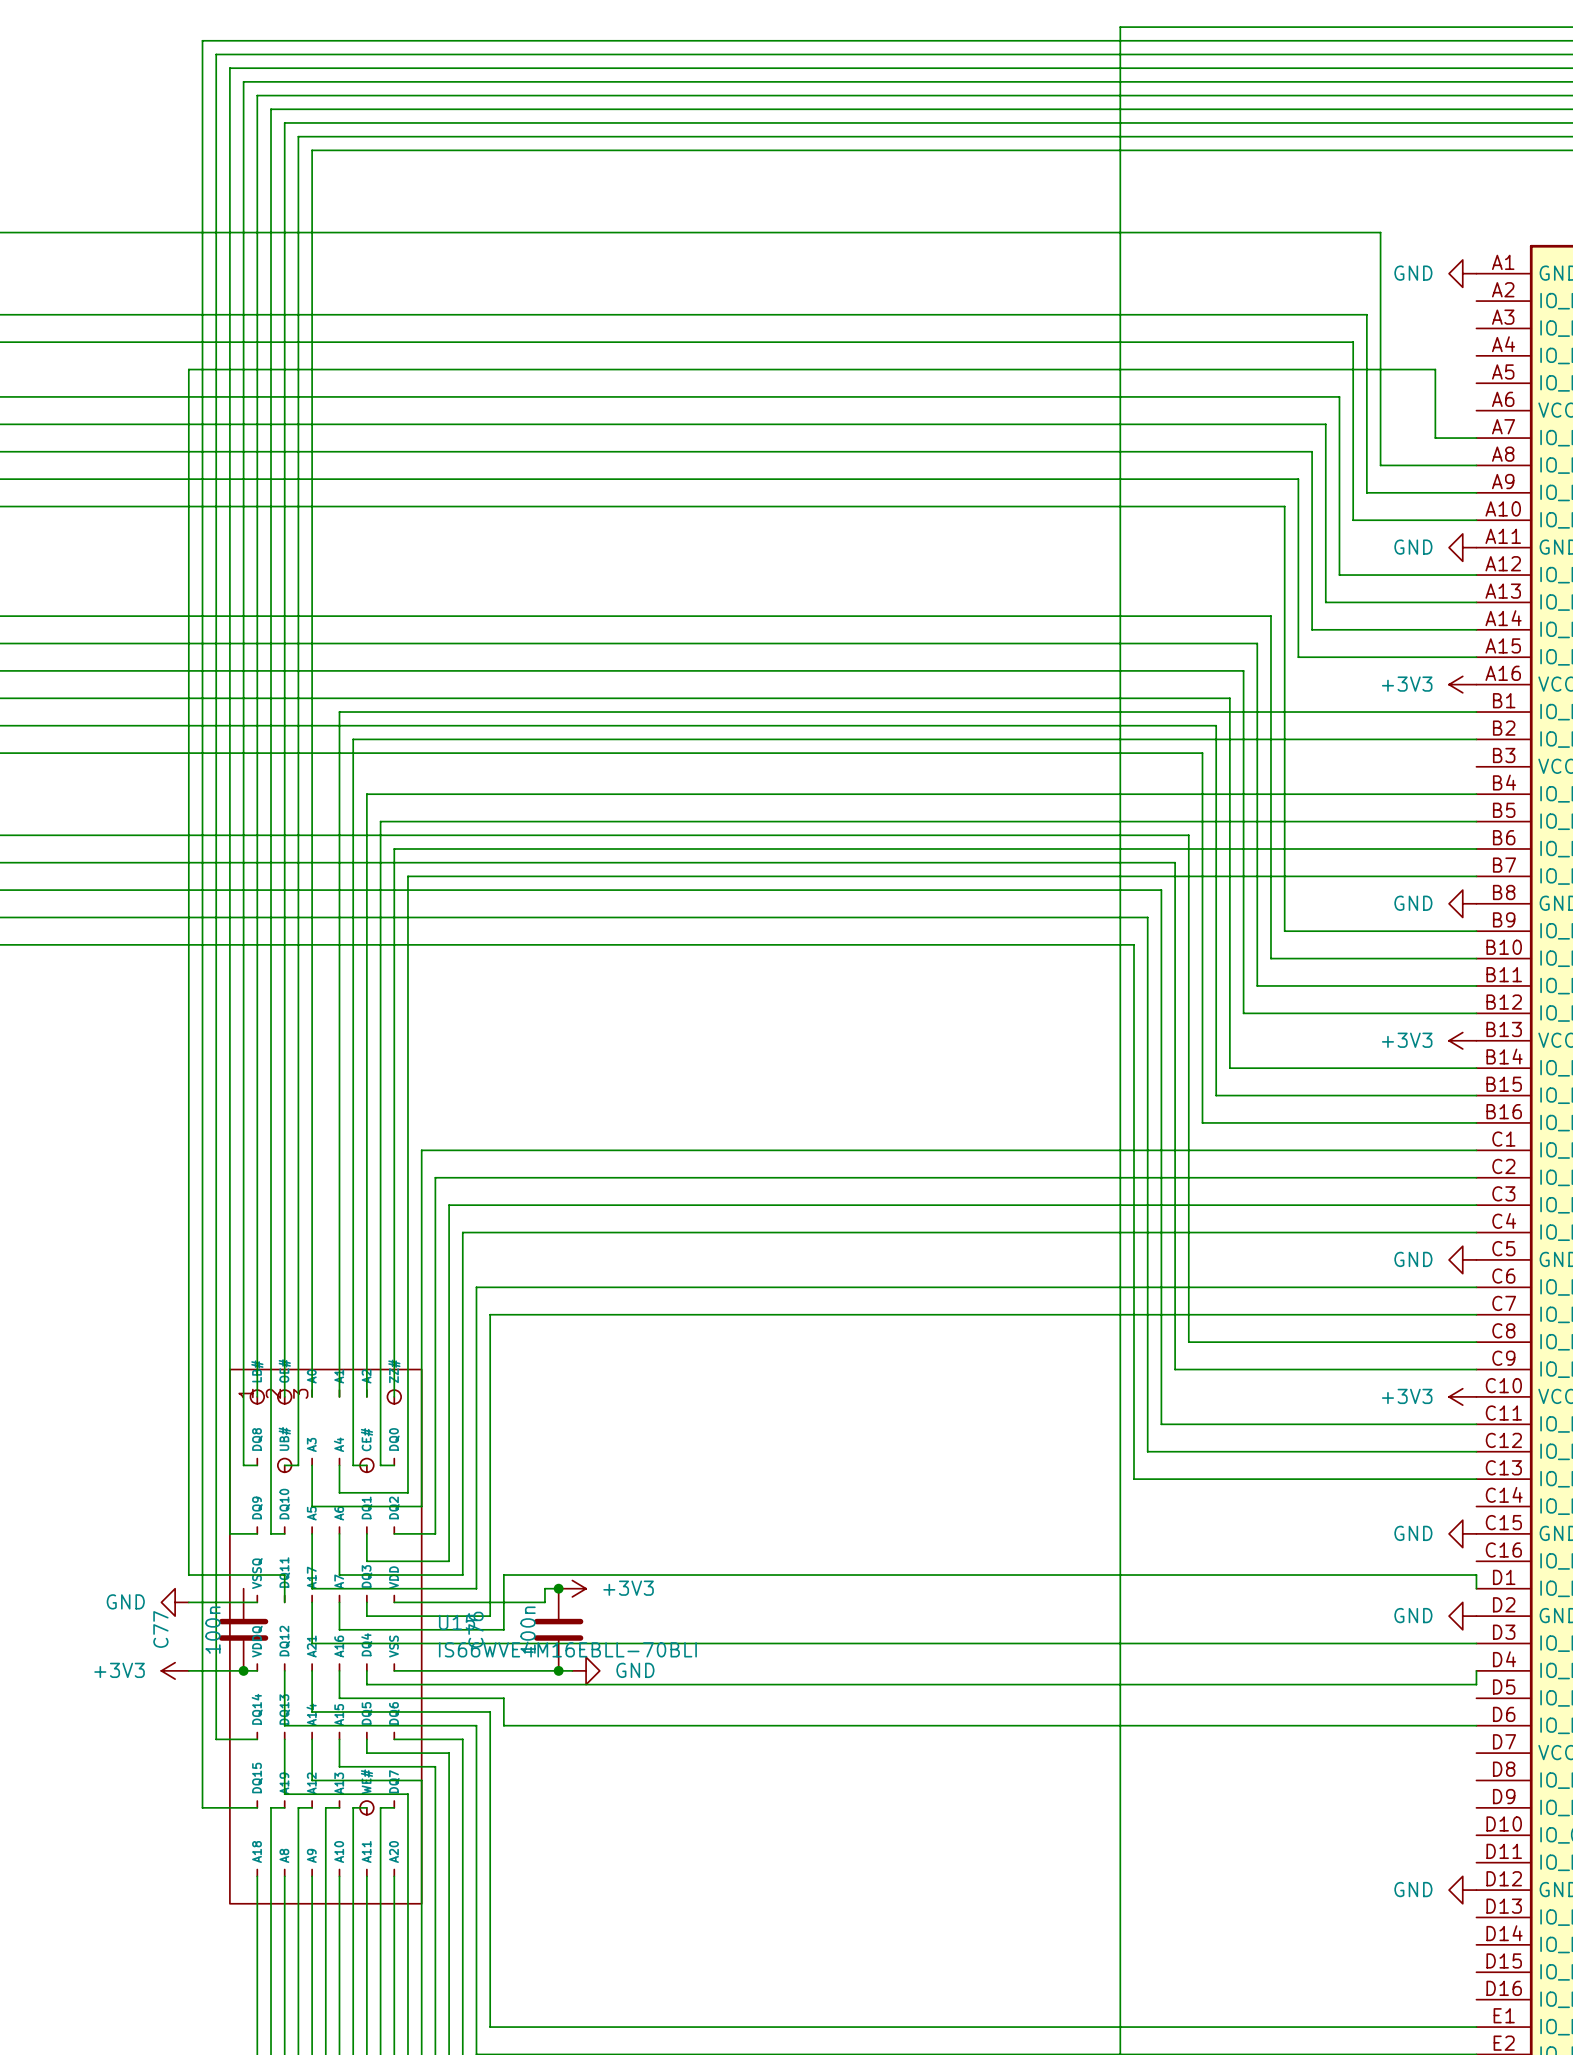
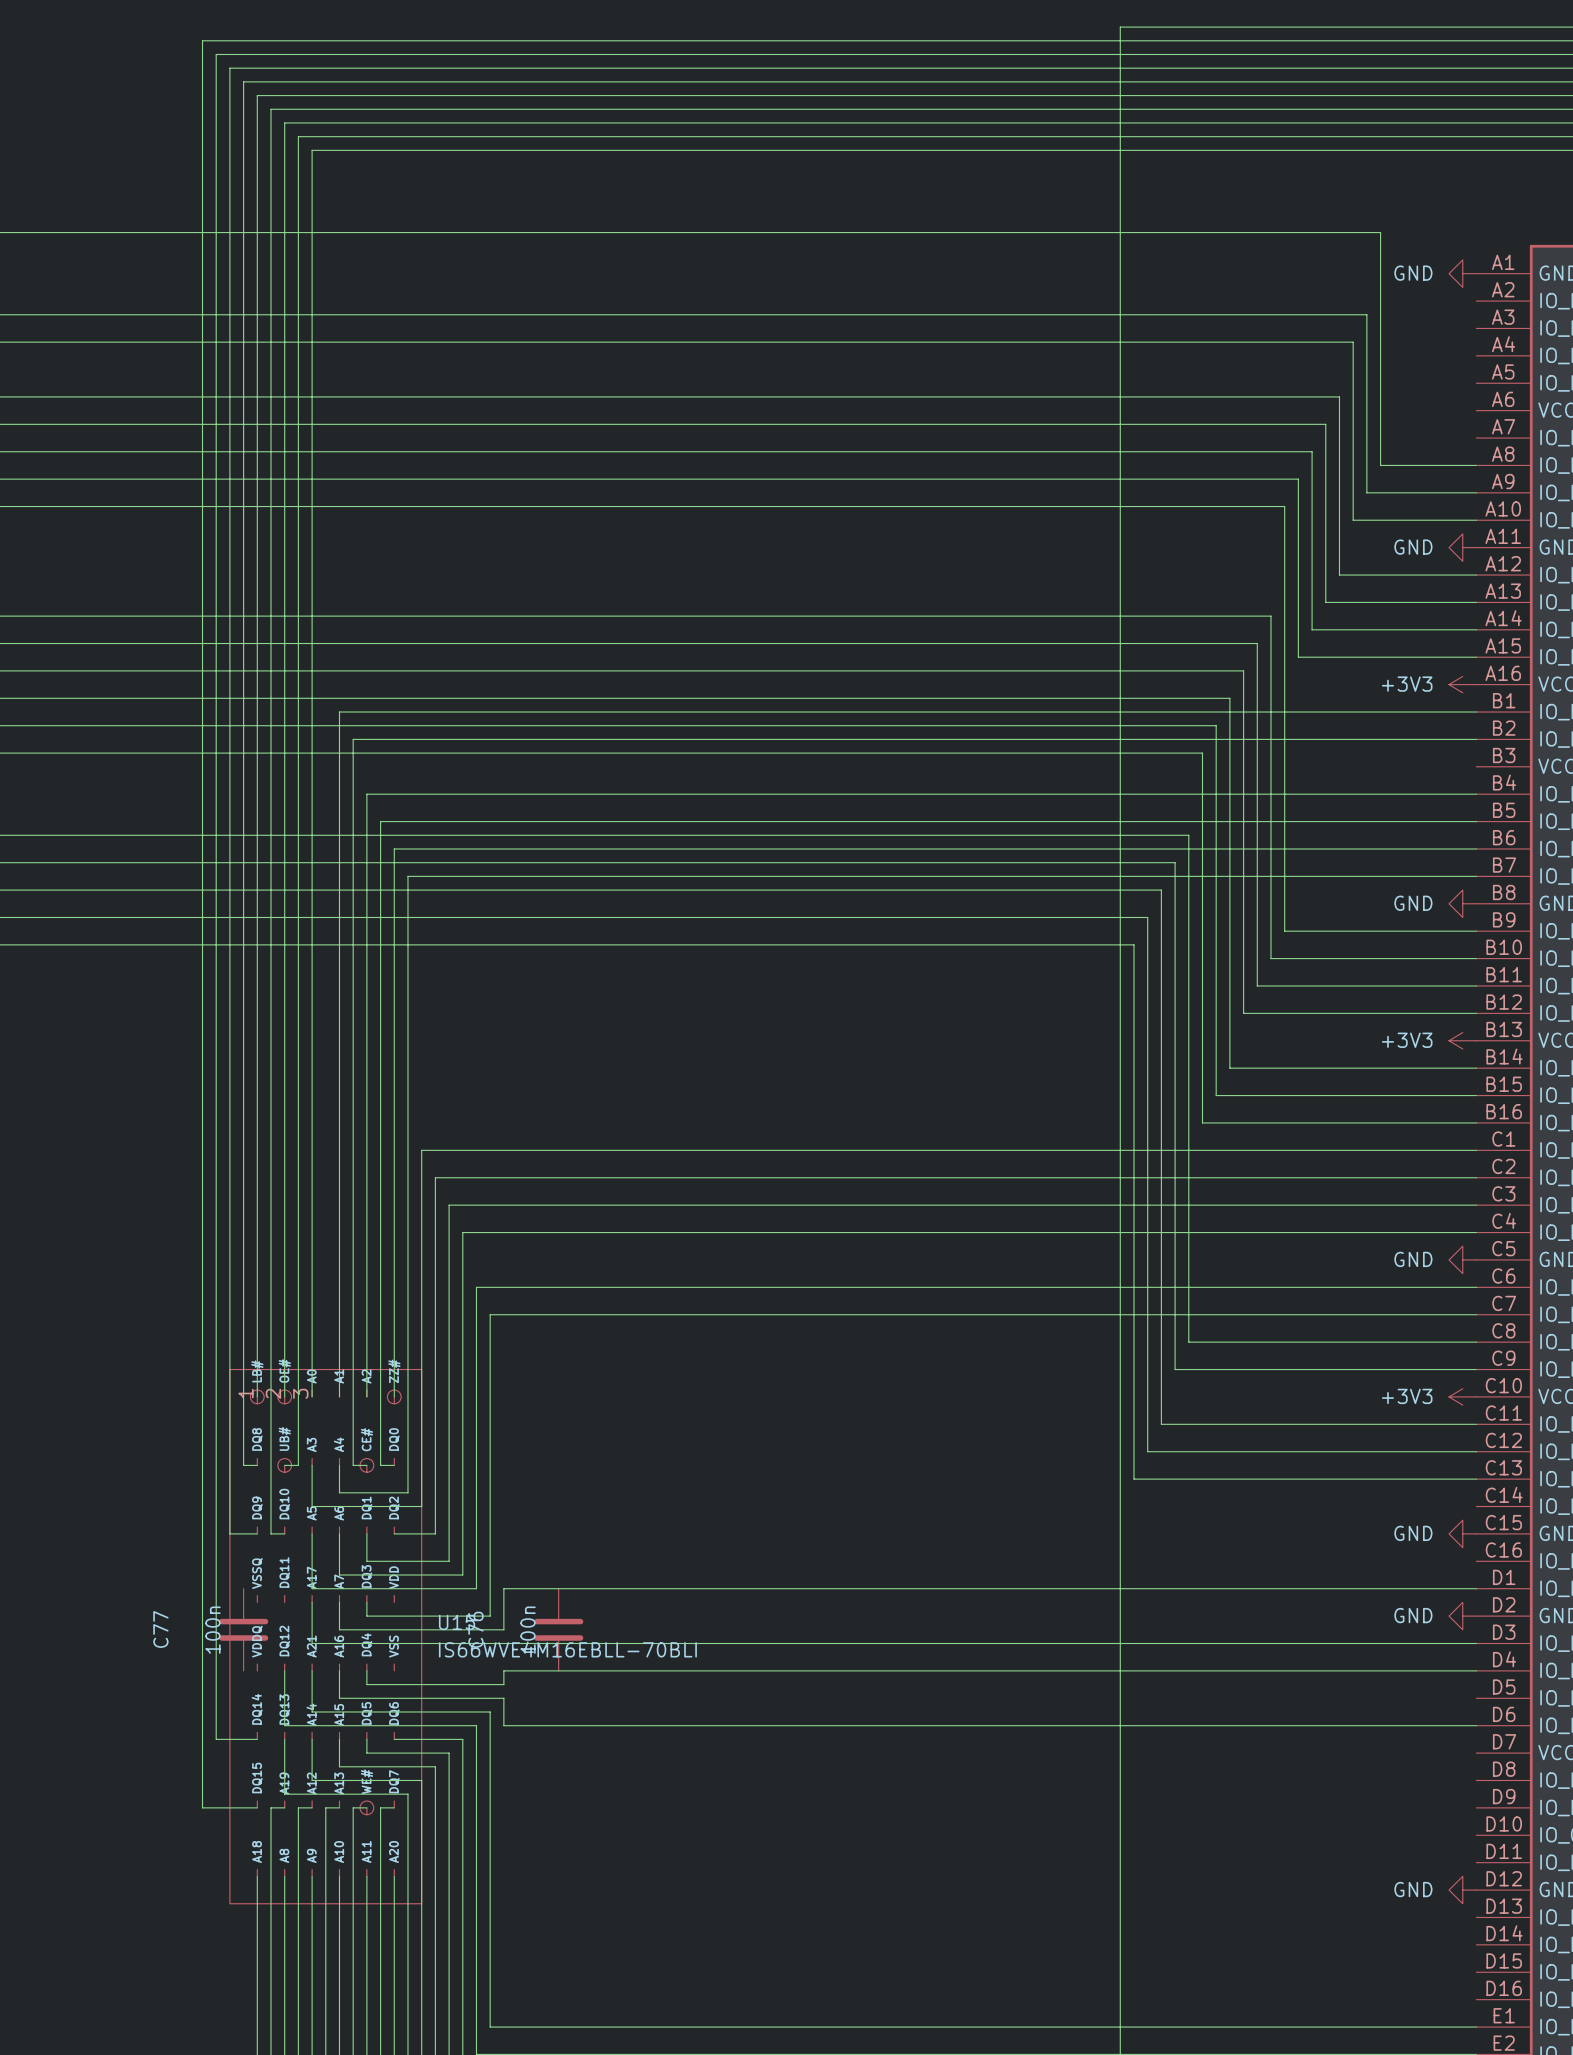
wire: (1476, 438) (1435, 438) (1435, 369) (188, 369) (188, 1575) (284, 1575) (284, 1602) -> none
wire: (503, 1588) (503, 1575) (1476, 1575) (1476, 1588) -> (558, 1588) (1476, 1588)
wire: (544, 1588) (544, 1602) (394, 1602) -> (544, 1588) (503, 1588)
junction: (558, 1588) -> none
power symbol: +3V3 (572, 1588) -> none
power symbol: GND (175, 1602) -> none
wire: (188, 1602) (257, 1602) -> none
power symbol: +3V3 (175, 1670) -> none
wire: (188, 1670) (257, 1670) -> none
junction: (243, 1670) -> none
wire: (394, 1670) (503, 1670) -> (503, 1684) (503, 1670)
junction: (558, 1670) -> none
power symbol: GND (586, 1670) -> none
wire: (1476, 1670) (1476, 1684) (503, 1684) -> (1476, 1670) (572, 1670)

